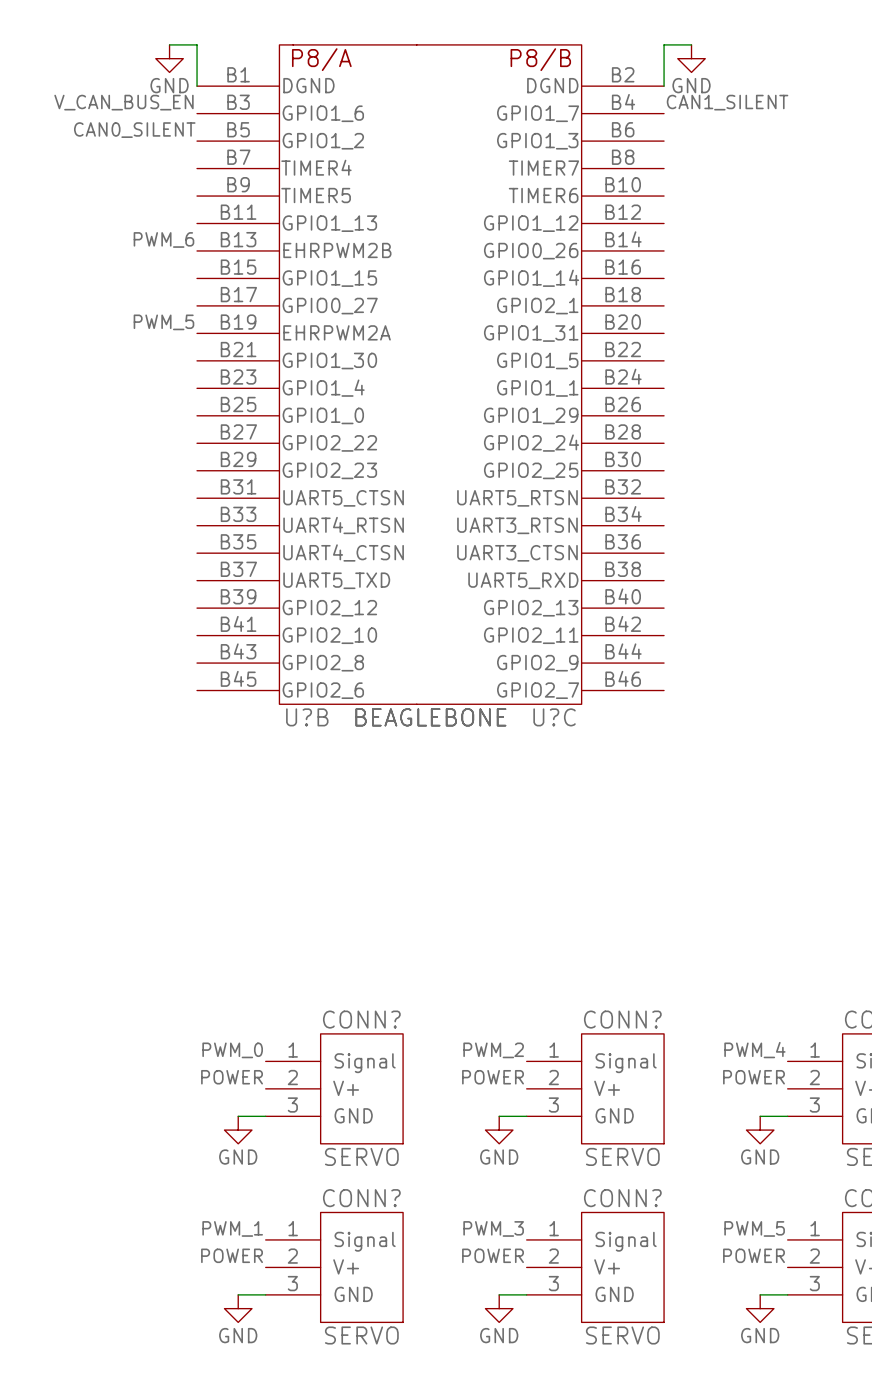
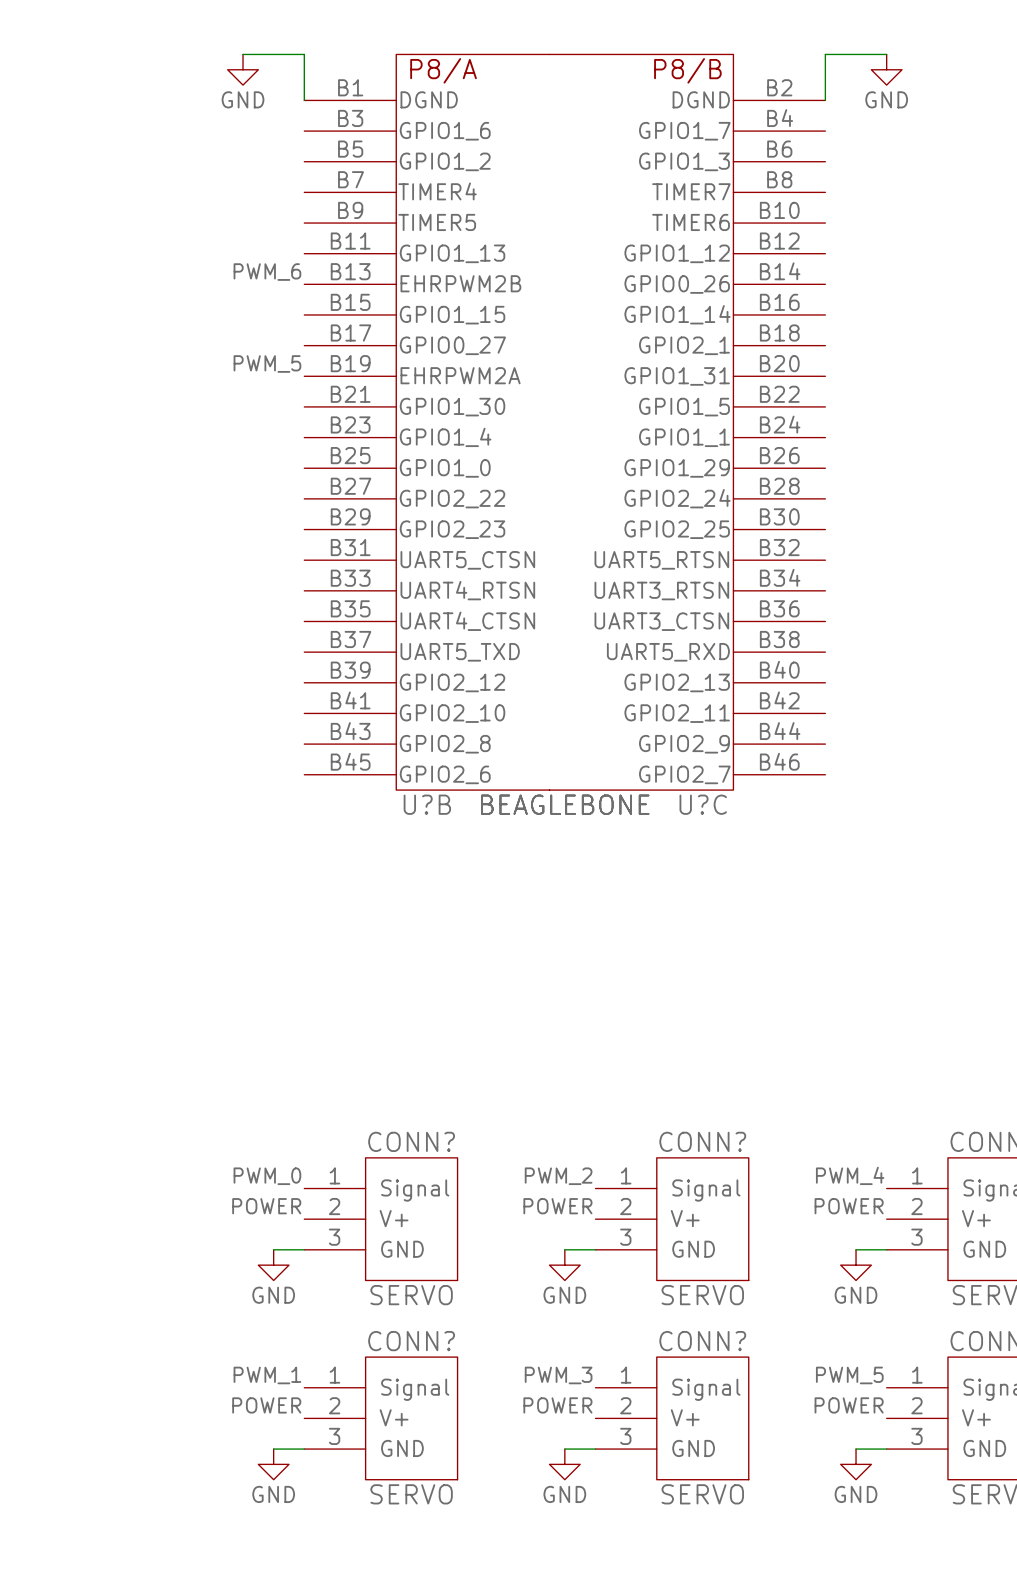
wire: (169, 44) (197, 44) (197, 86) -> none
wire: none -> (243, 54) (304, 54) (304, 100)
wire: (691, 44) (664, 44) (664, 86) -> none
wire: none -> (886, 54) (825, 54) (825, 100)
power symbol position: GND (169, 58) -> GND (243, 69)
power symbol position: GND (691, 58) -> GND (886, 69)
label: V_CAN_BUS_EN (124, 102) -> none
label: CAN1_SILENT (727, 102) -> none
label: CAN0_SILENT (134, 130) -> none
label position: PWM_6 (163, 239) -> PWM_6 (267, 272)
label position: PWM_5 (163, 322) -> PWM_5 (267, 364)
U?B position: (306, 374) -> (426, 422)
U?C position: (540, 374) -> (687, 422)

